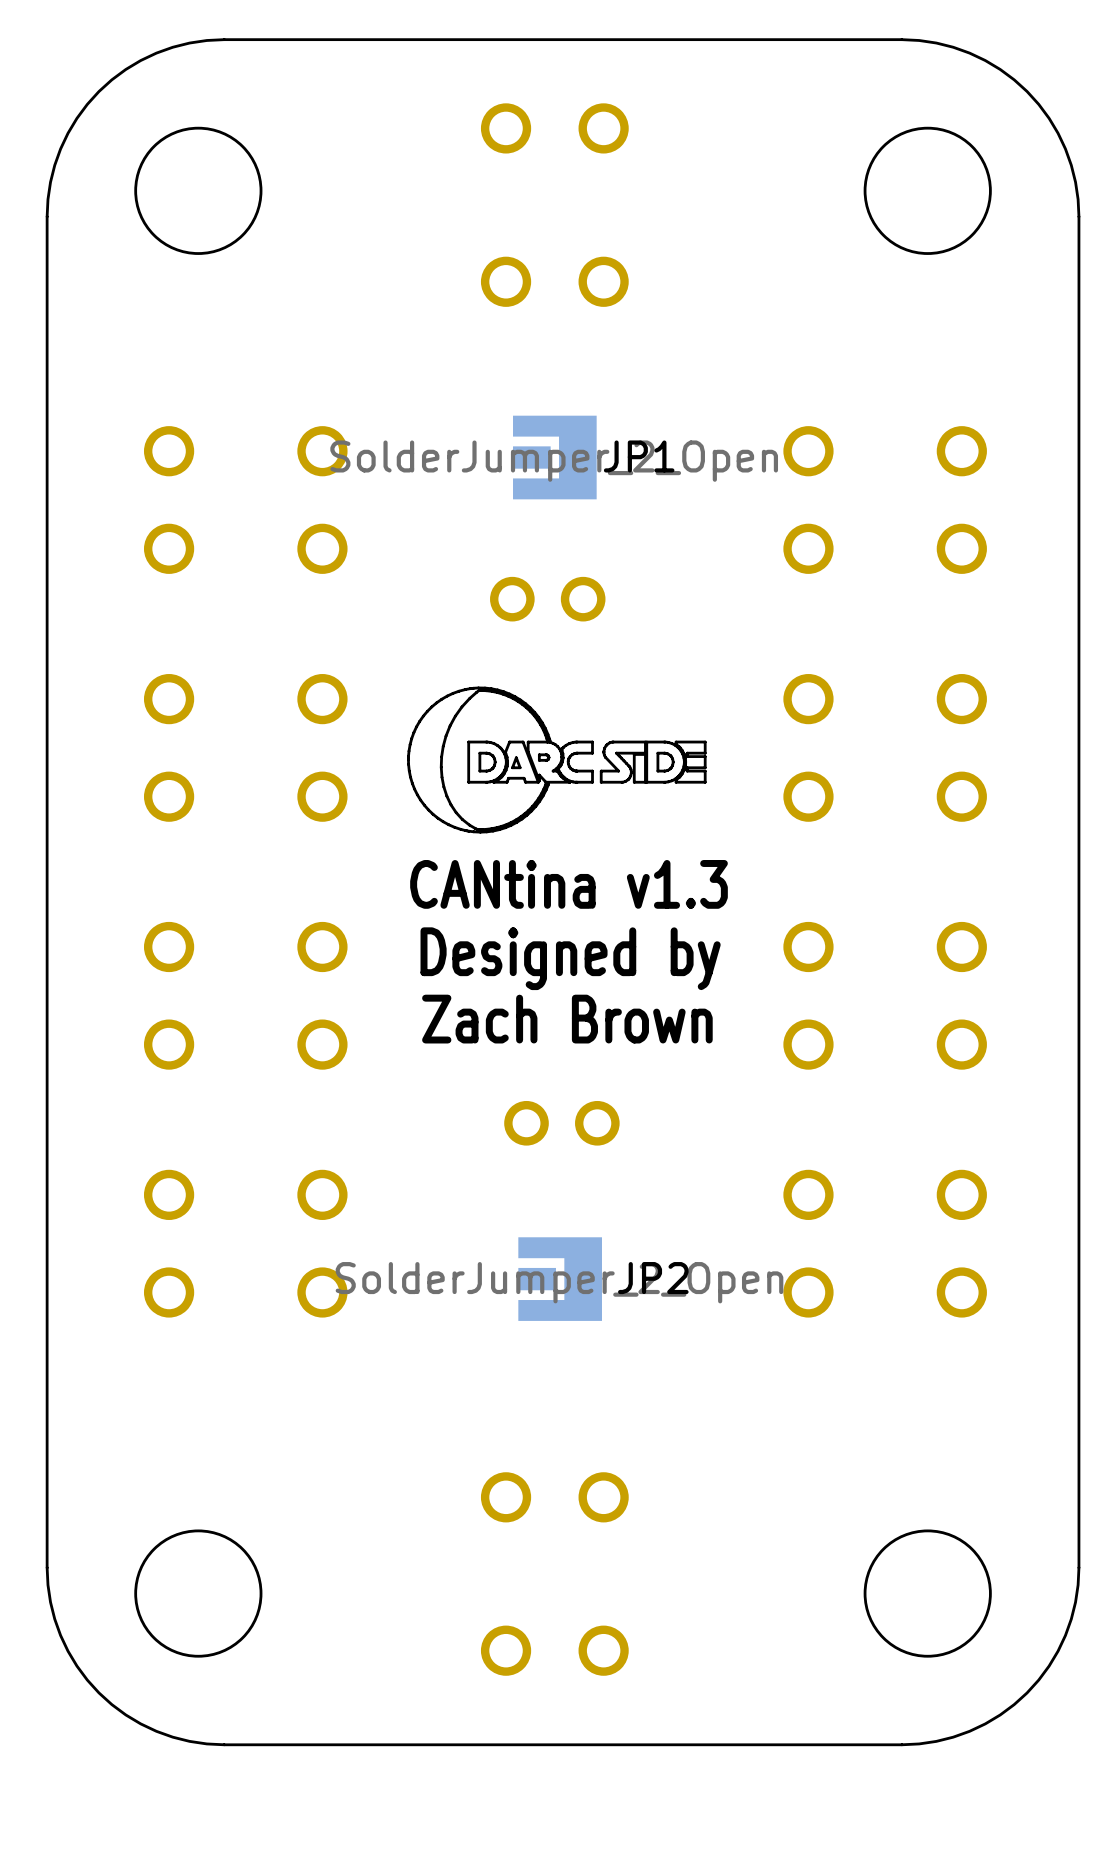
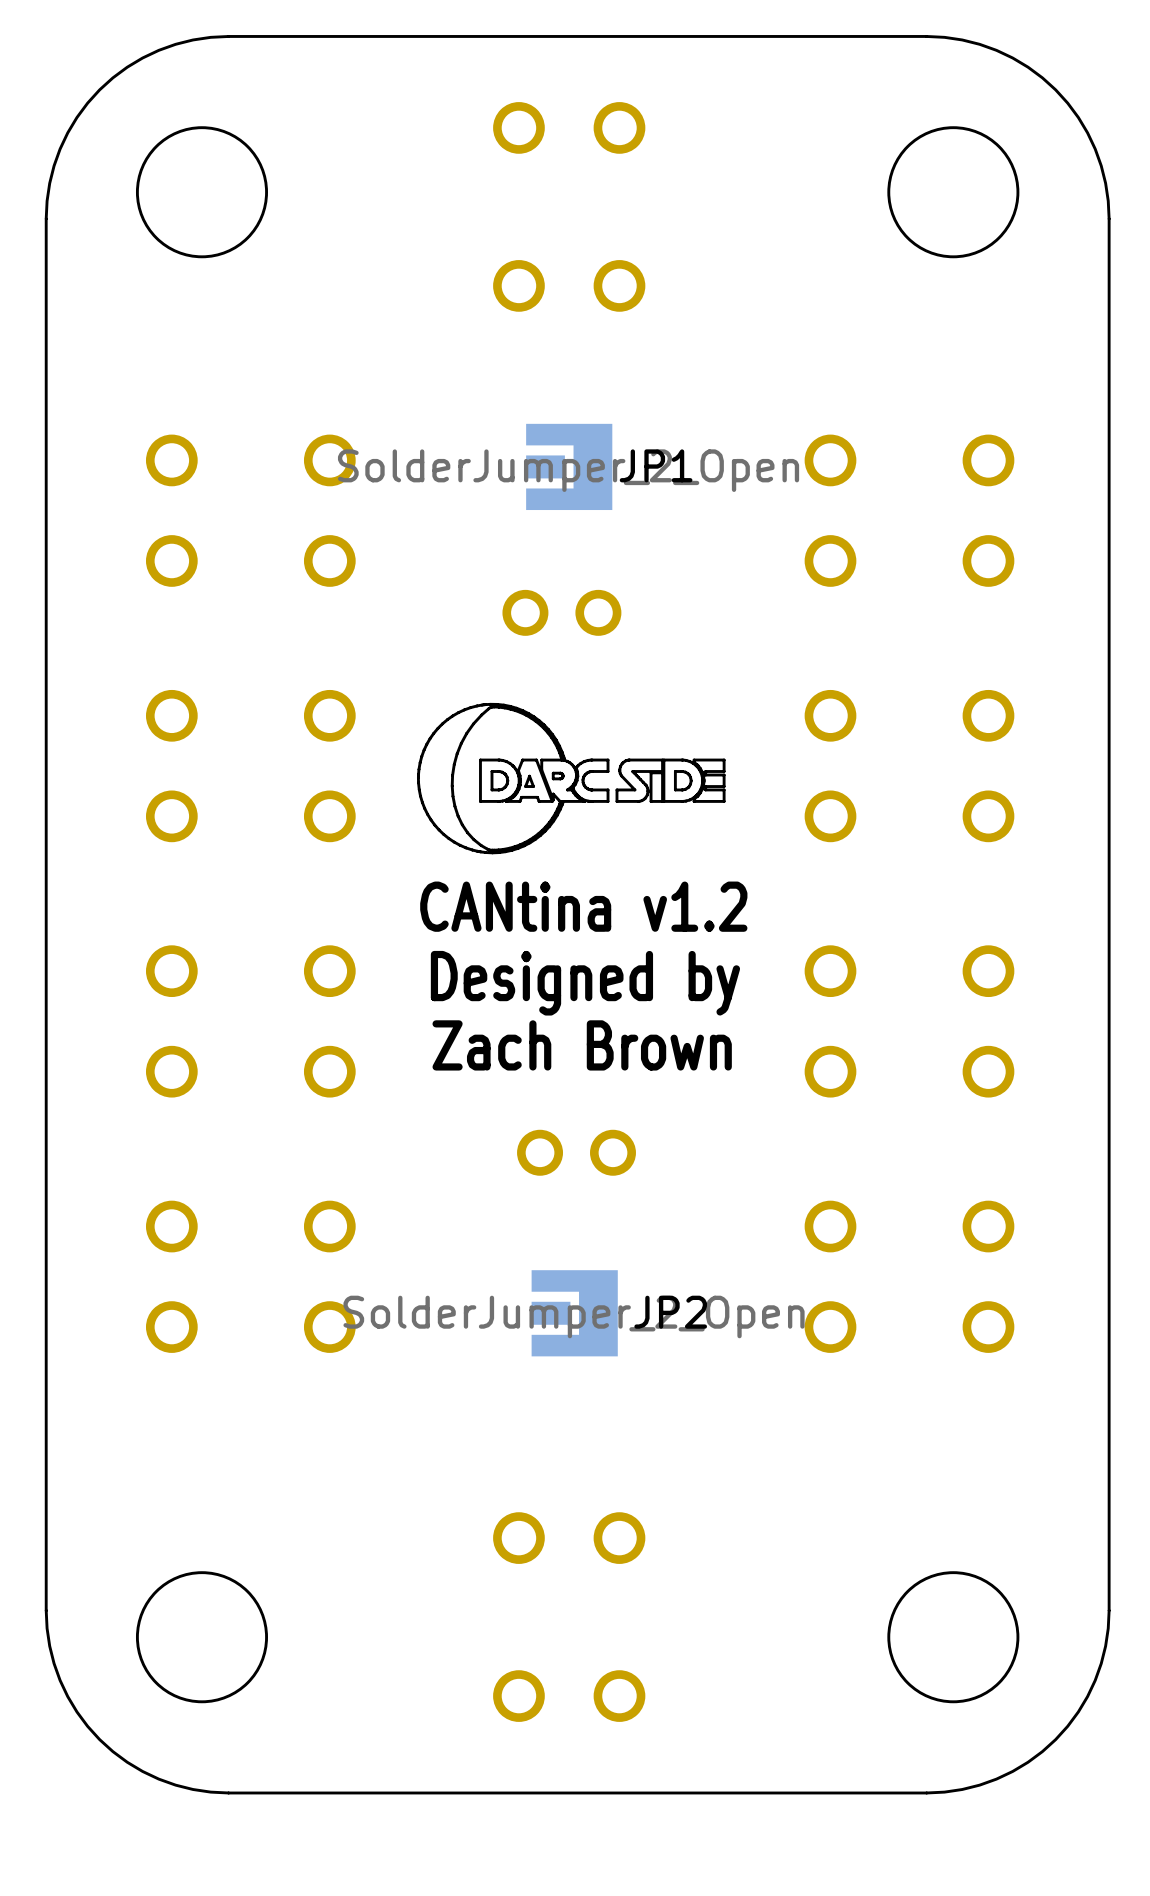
text: CANtina v1.3 (569, 884) -> CANtina v1.2 (583, 906)

